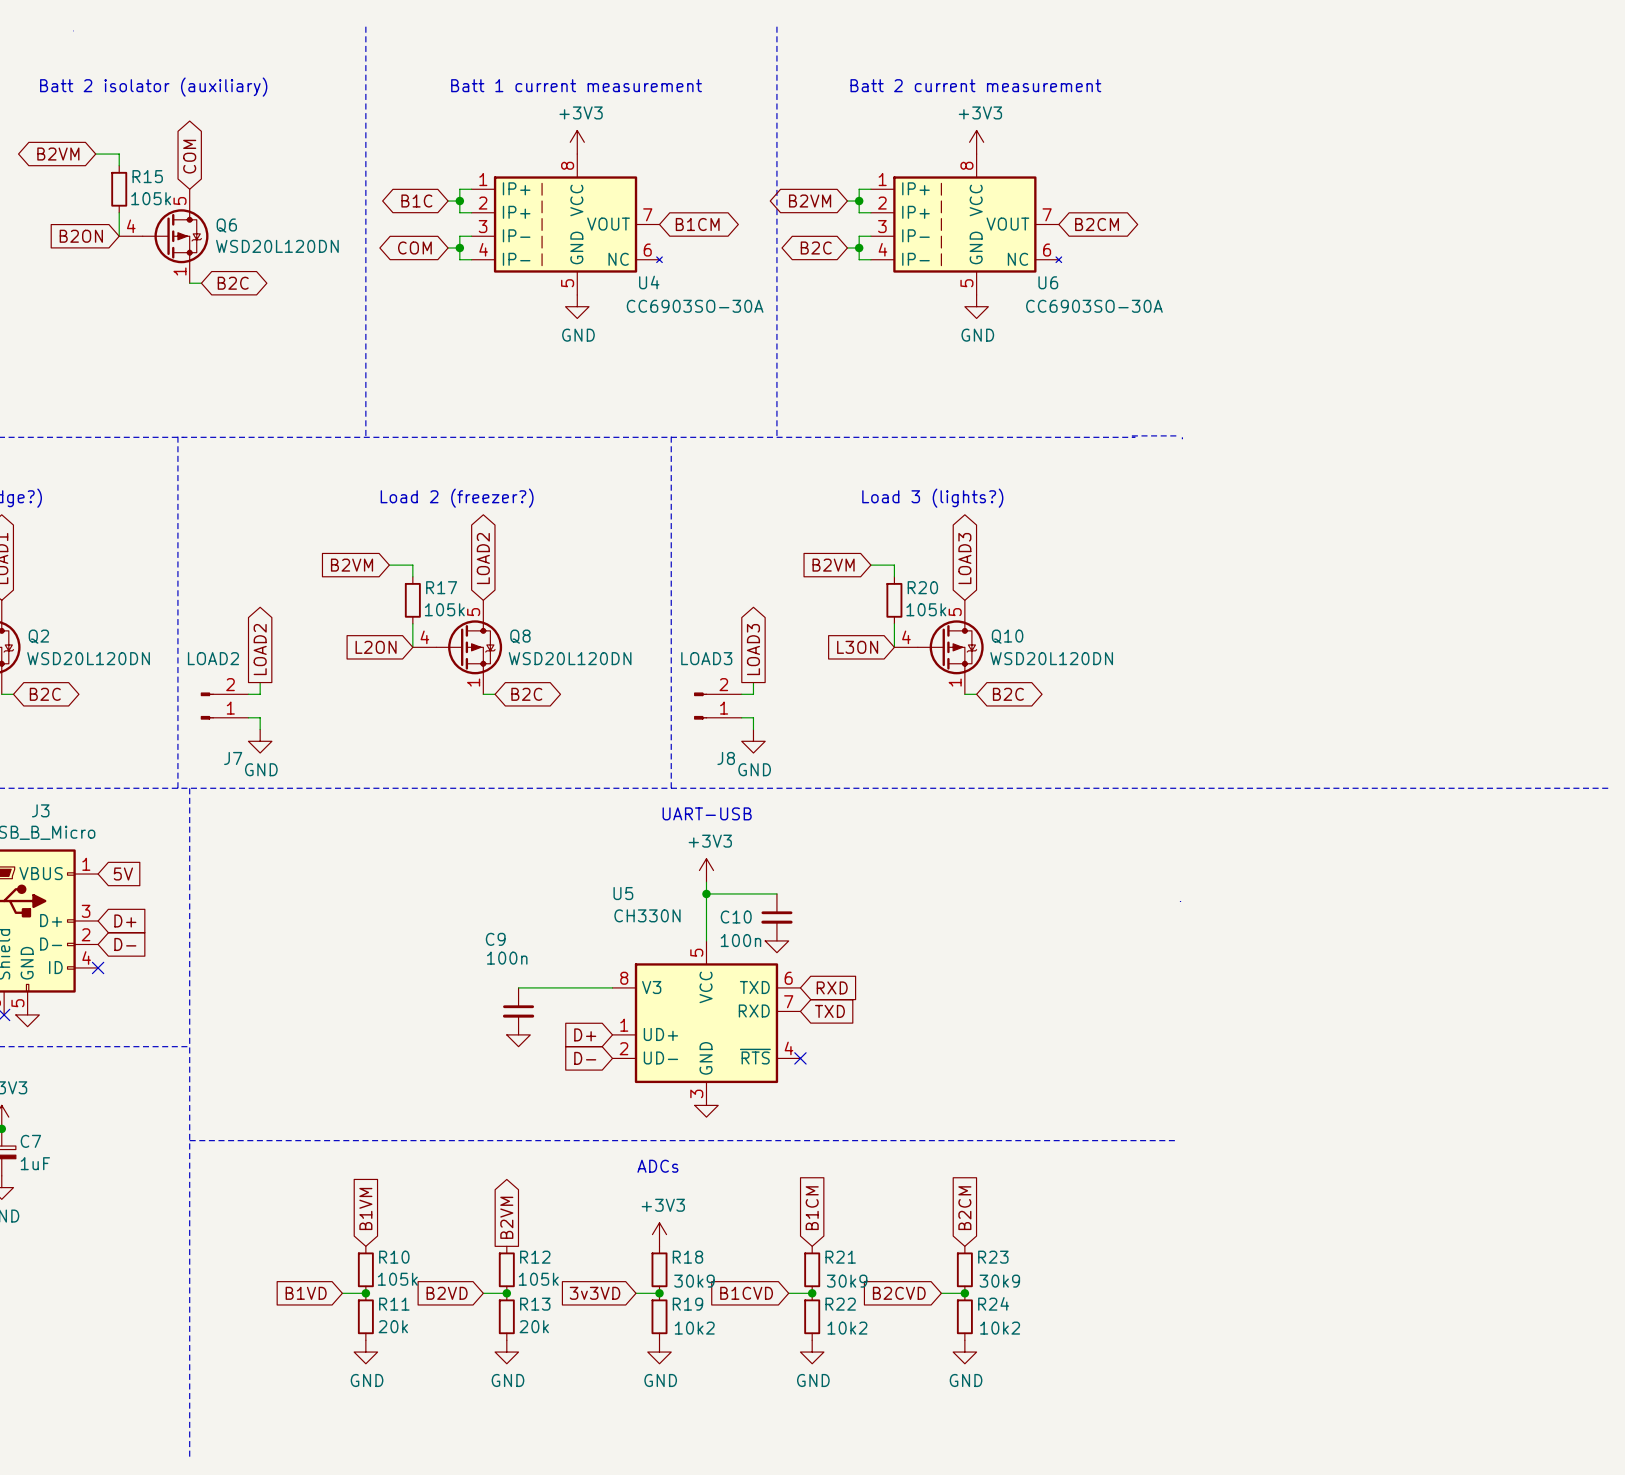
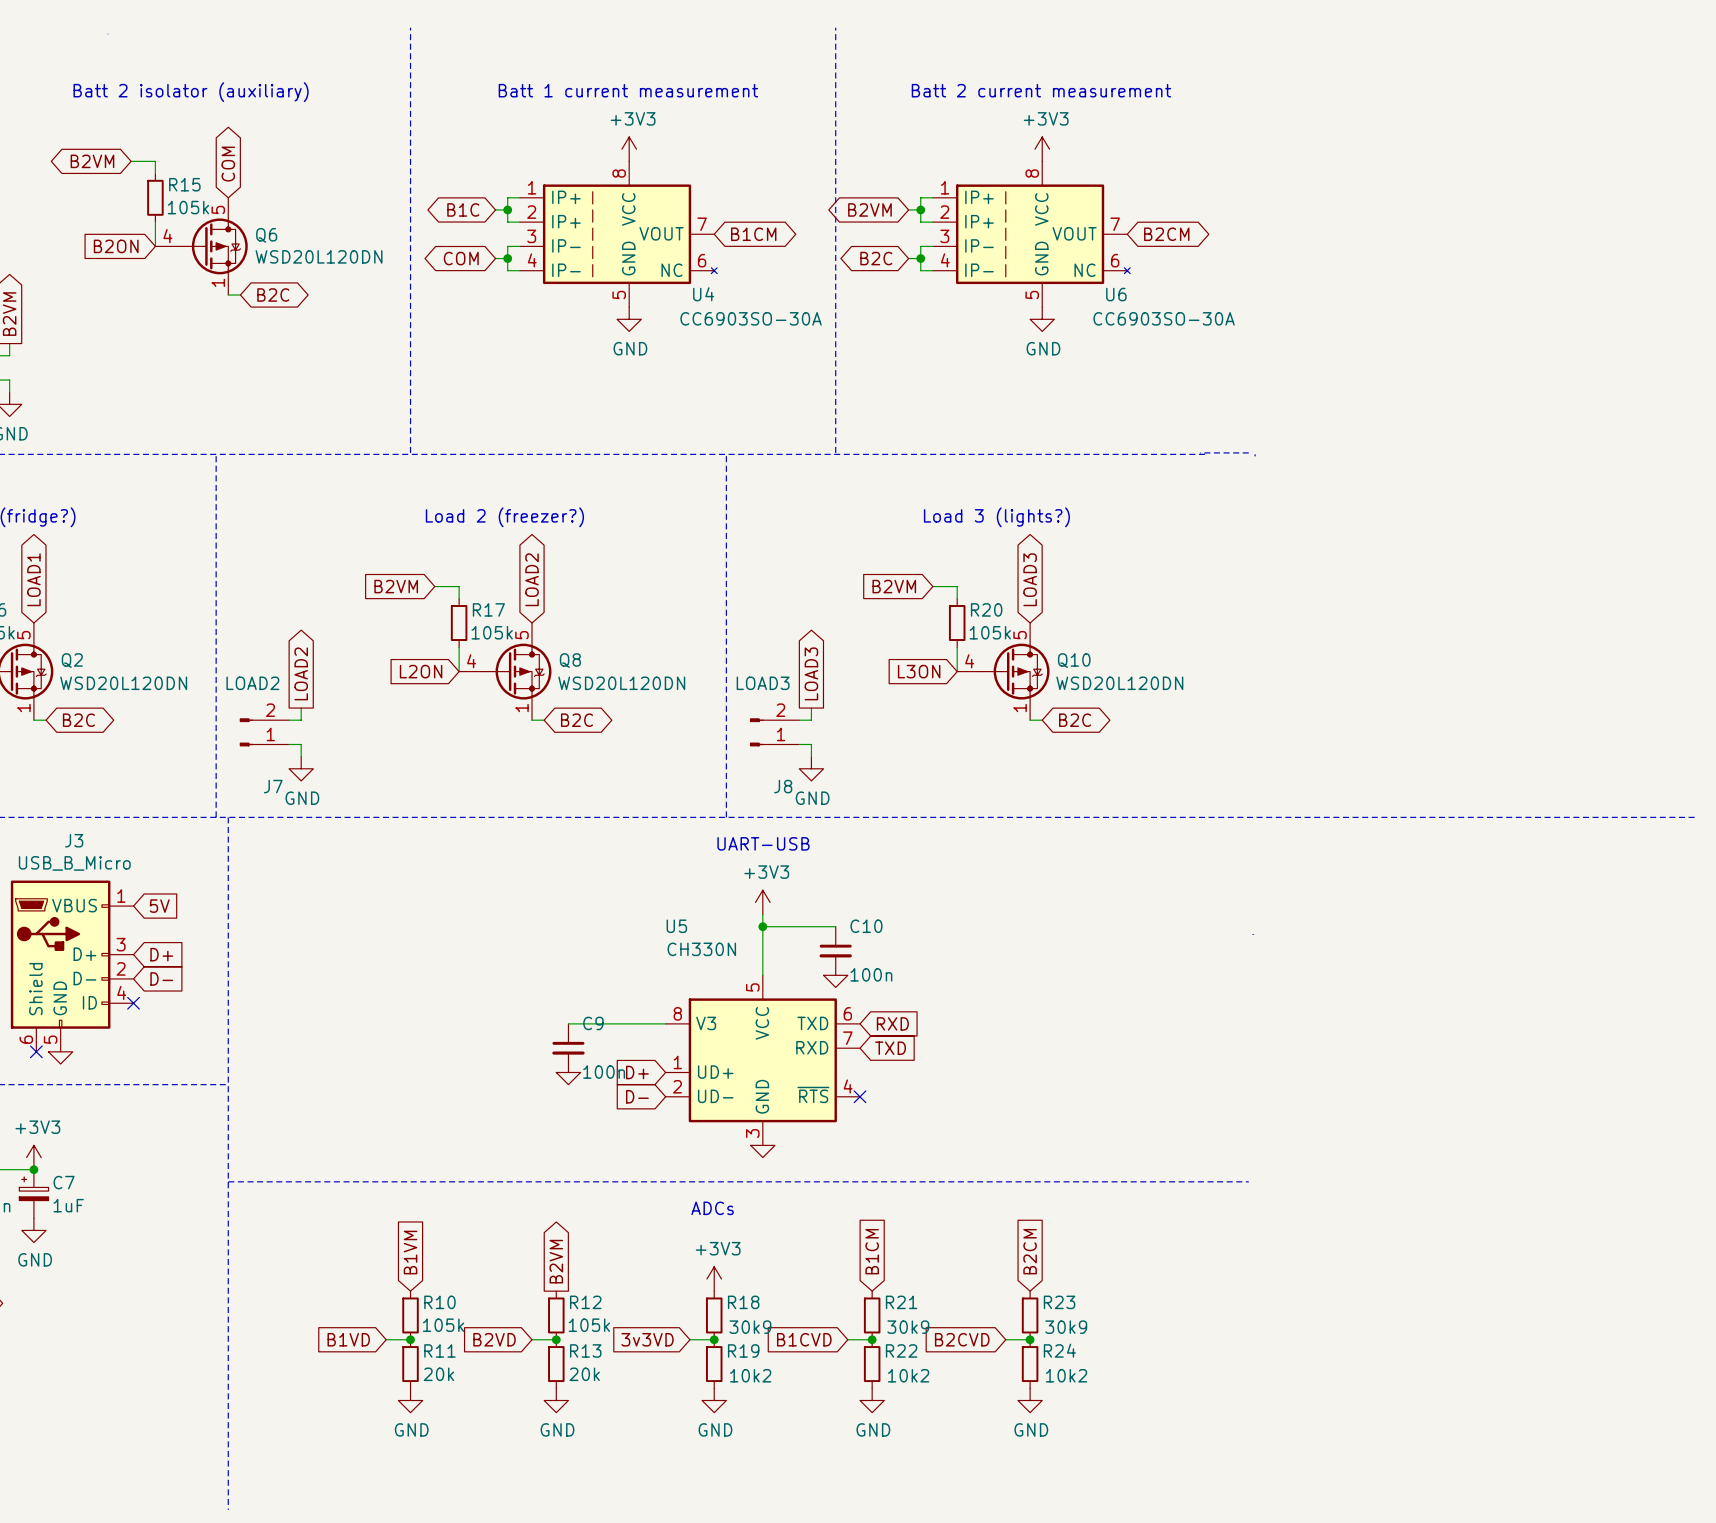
C10 name position: C10 (736, 917) -> C10 (866, 926)
C9 name position: C9 (495, 939) -> C9 (593, 1023)
C10 value position: 100n (740, 940) -> 100n (871, 974)
C9 value position: 100n (507, 958) -> 100n (604, 1072)

